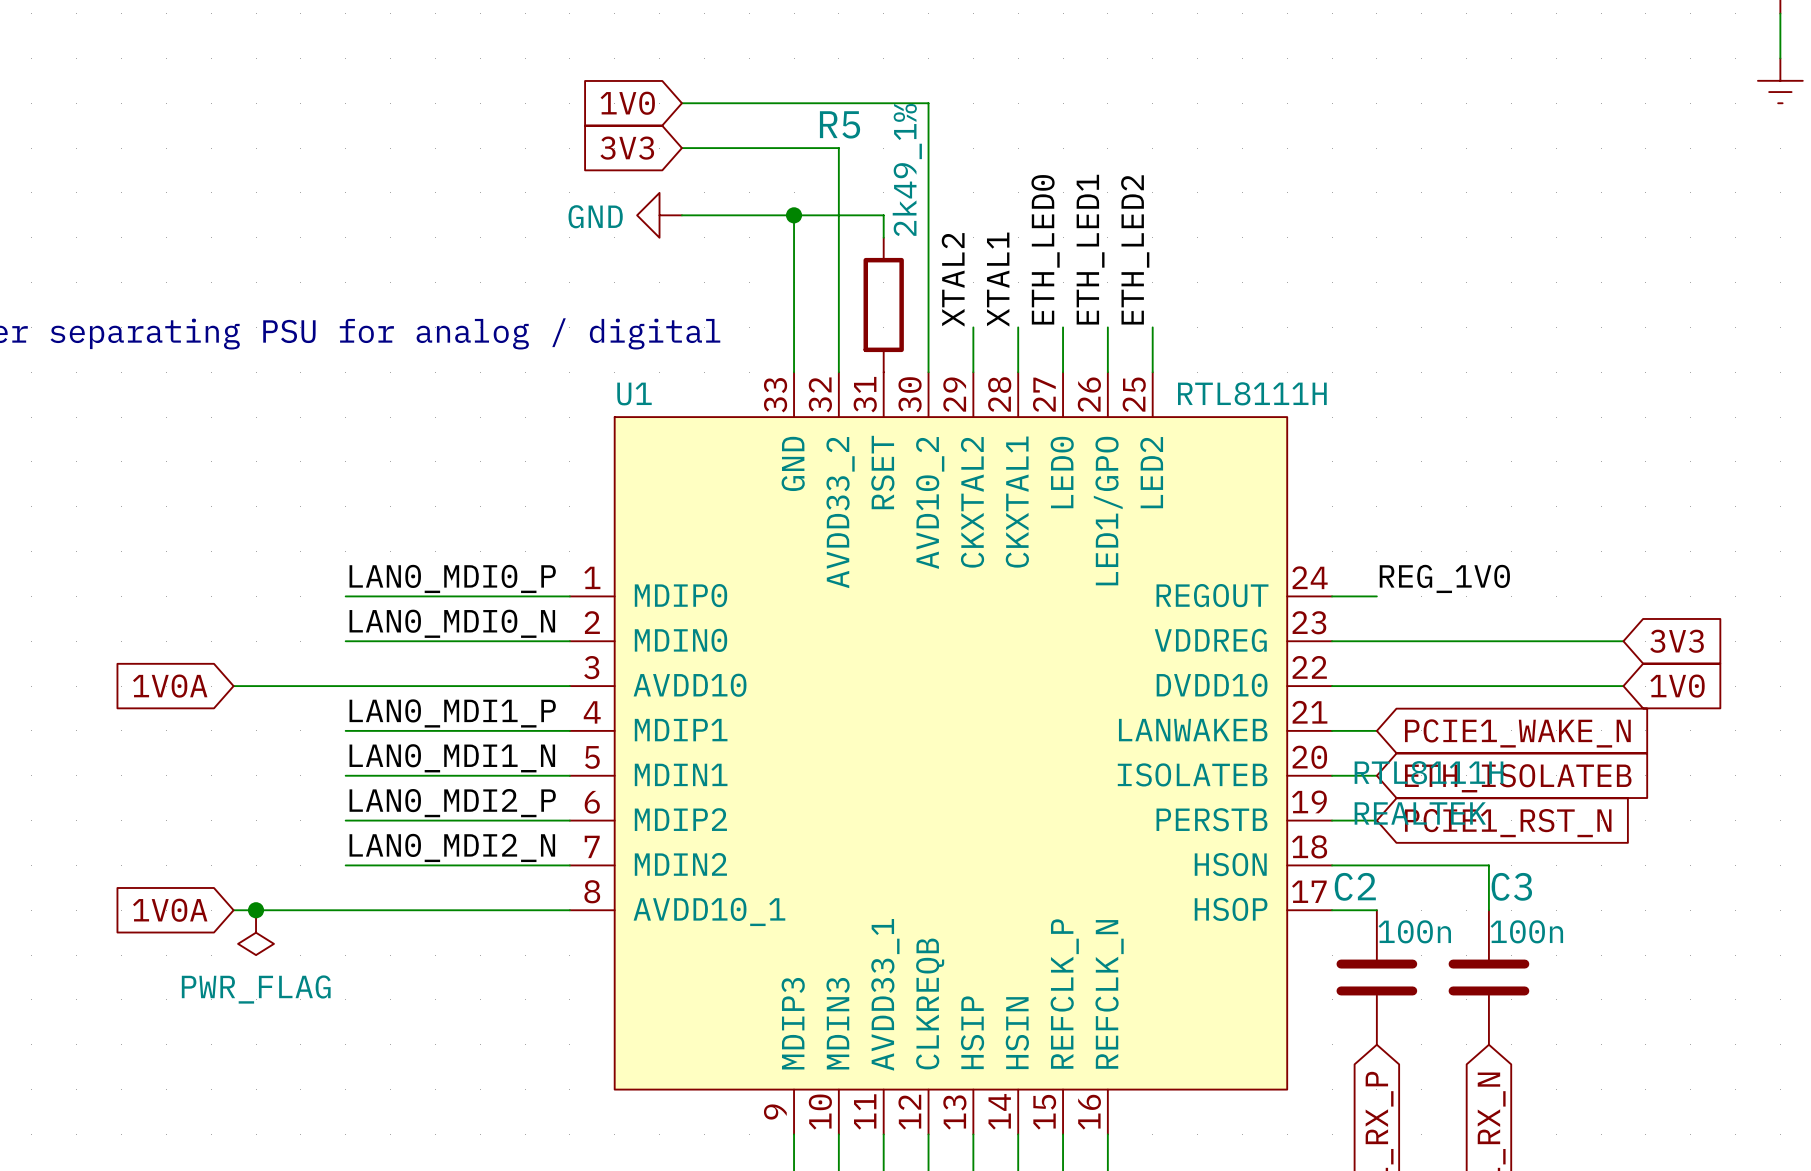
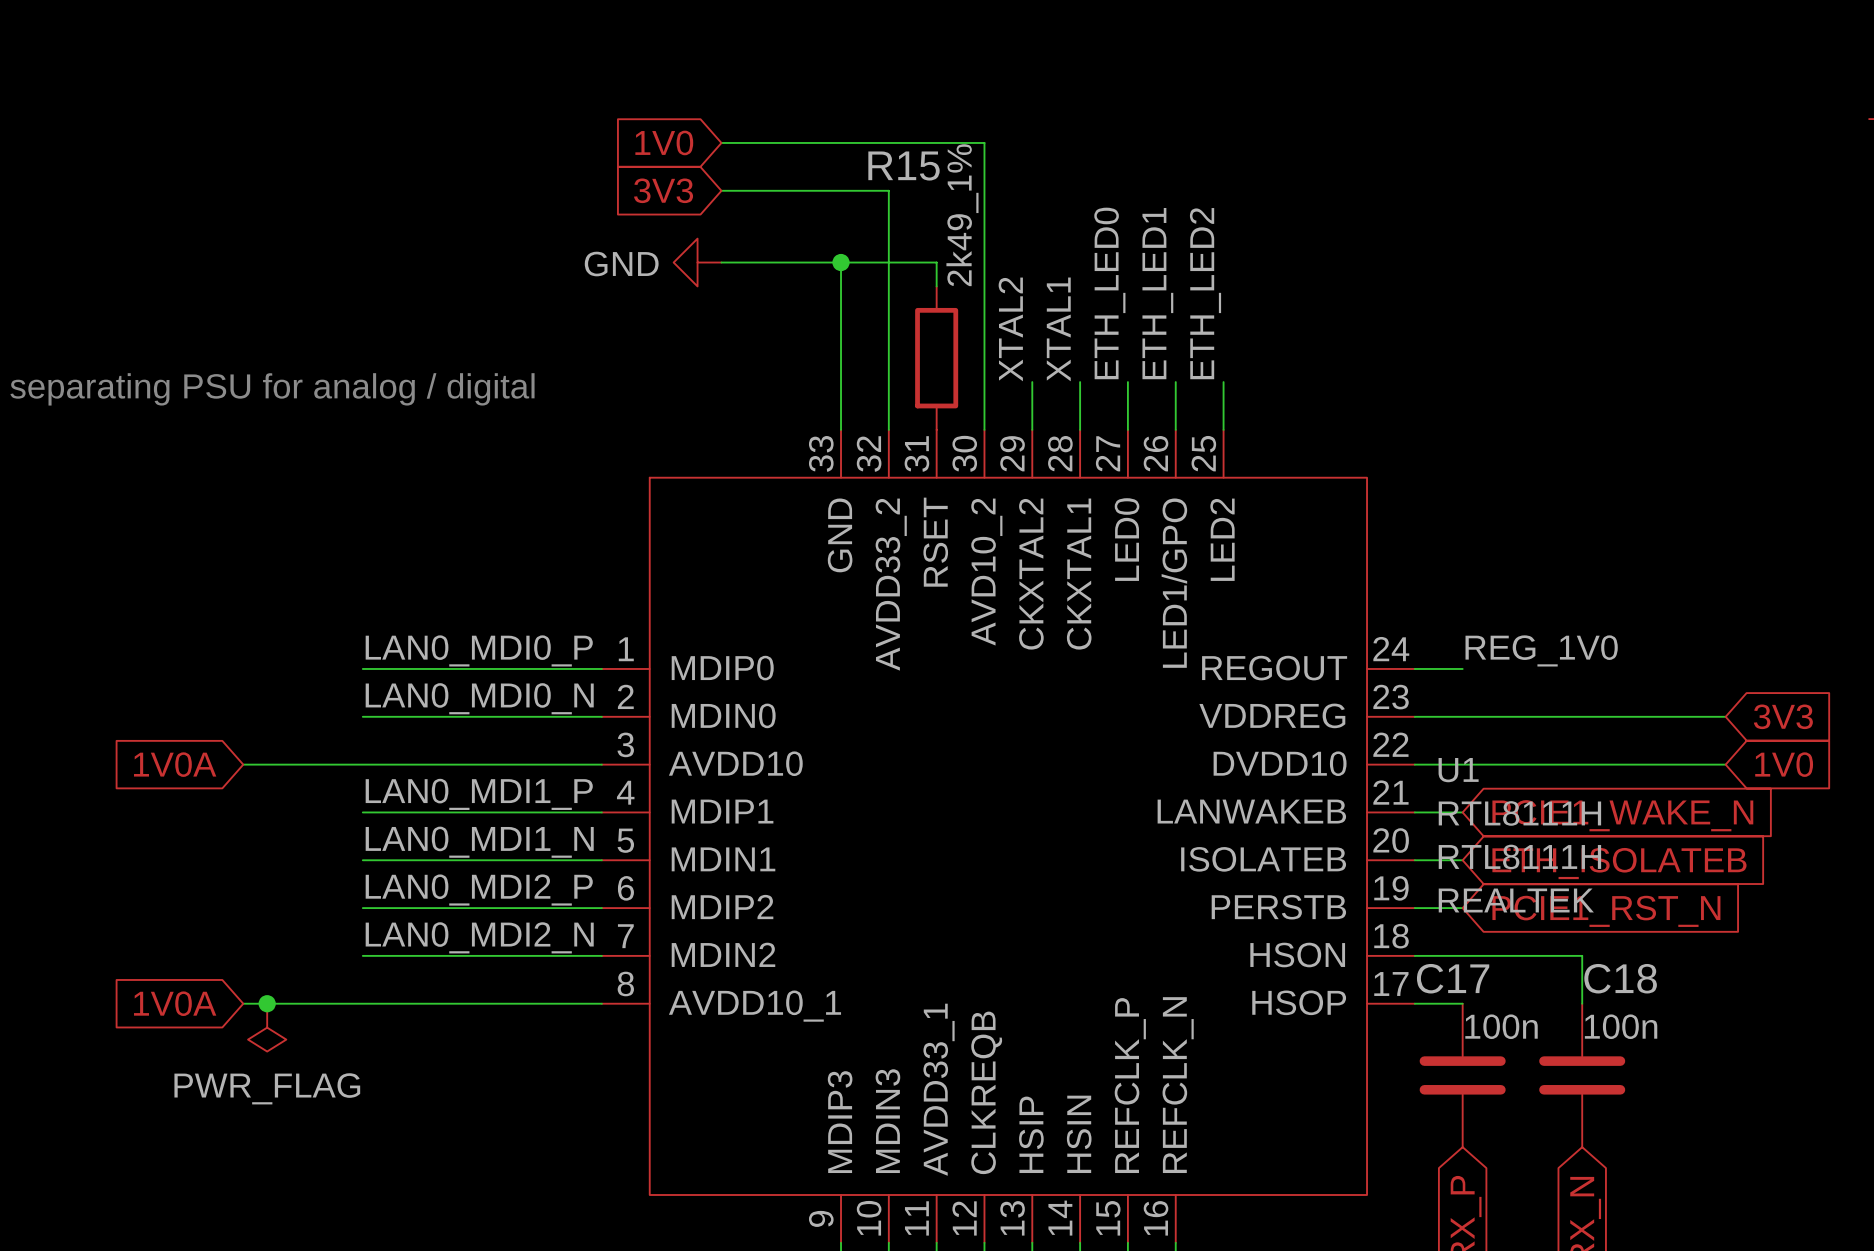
R5 name: R5 (840, 124) -> R15 (904, 166)
U1 value position: RTL8111H (1252, 393) -> RTL8111H (1519, 813)
U1 name position: U1 (634, 394) -> U1 (1458, 770)
C2 name: C2 (1355, 886) -> C17 (1453, 978)
C3 name: C3 (1511, 886) -> C18 (1620, 978)

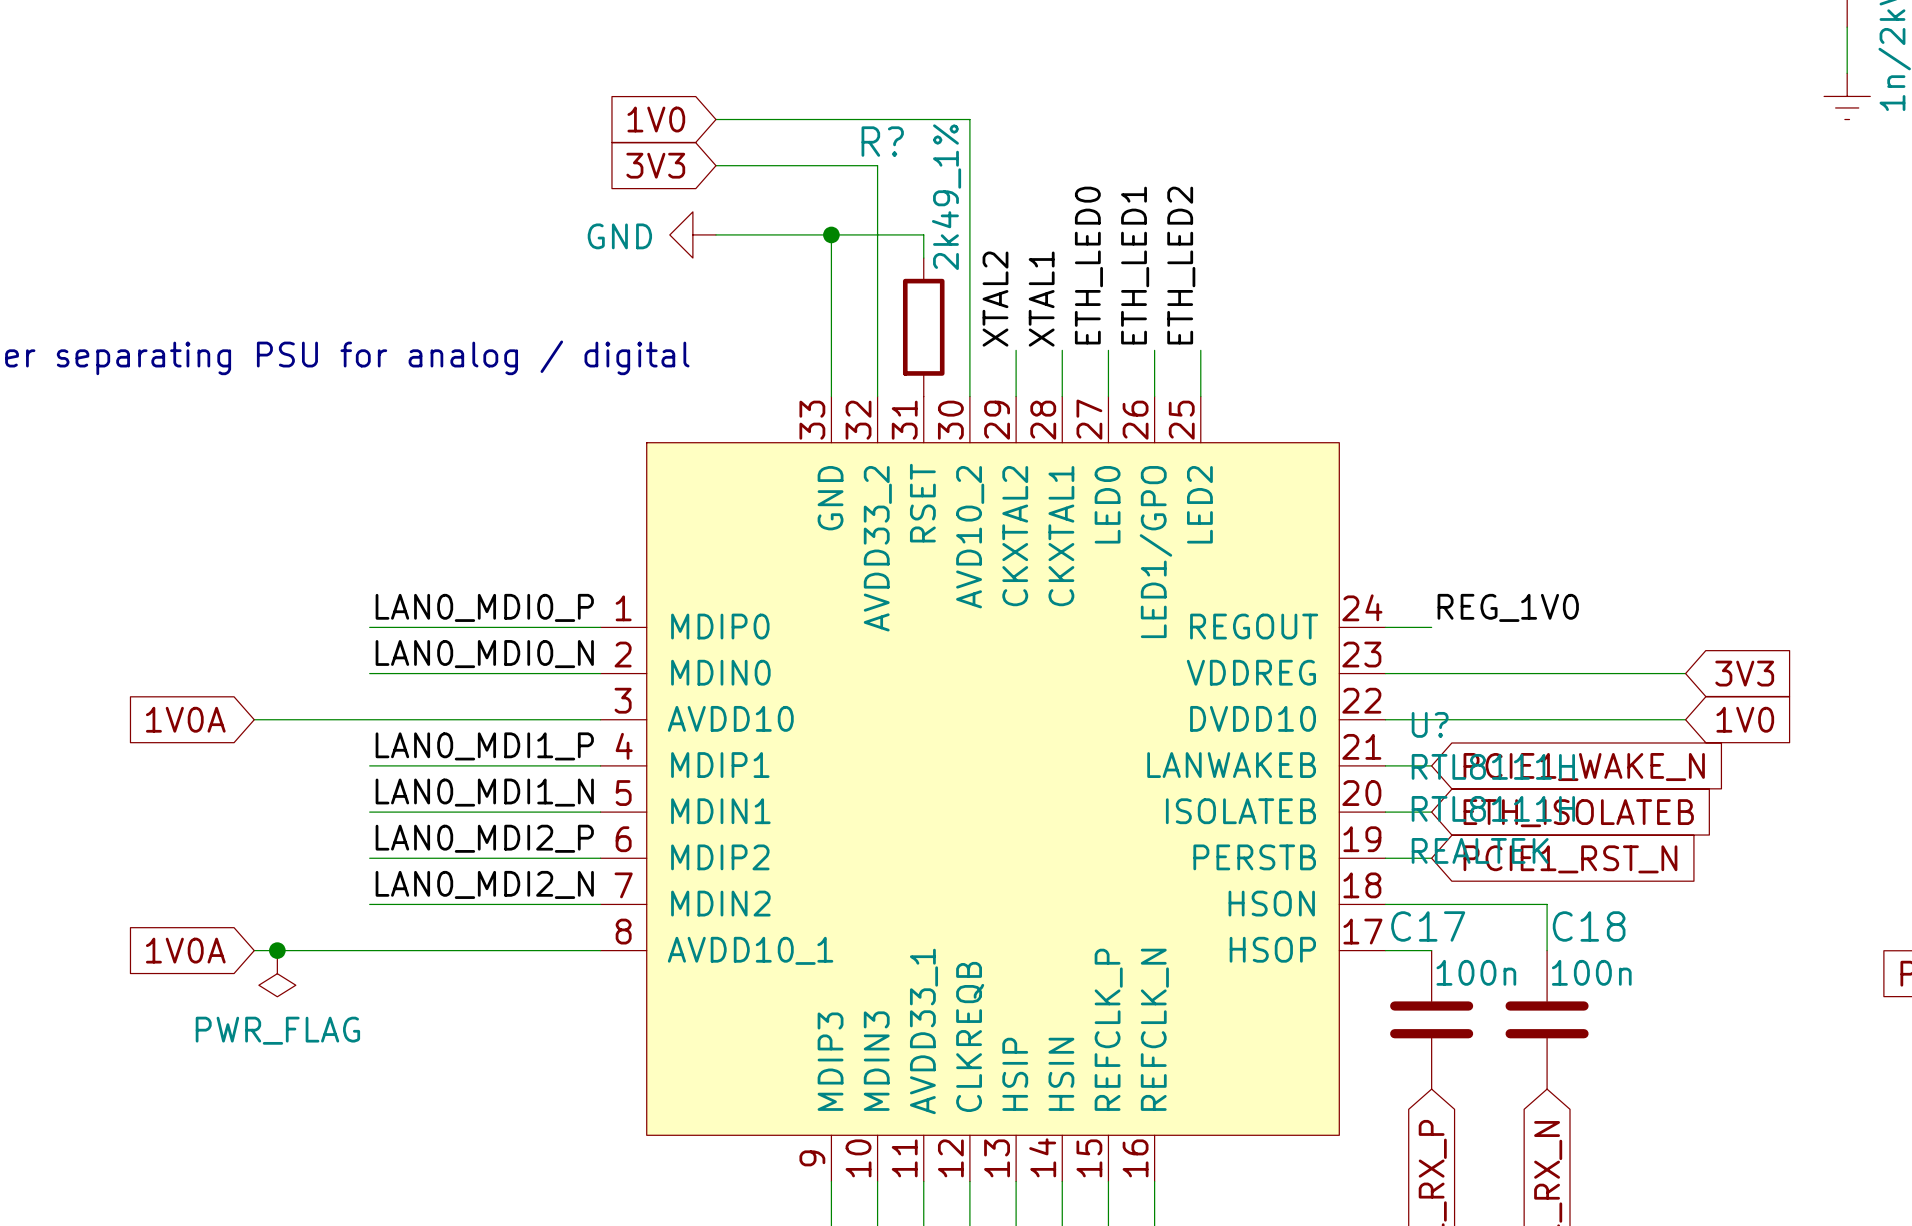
R15 name: R15 (904, 166) -> R? (882, 141)
U1 name: U1 (1458, 770) -> U? (1430, 724)

